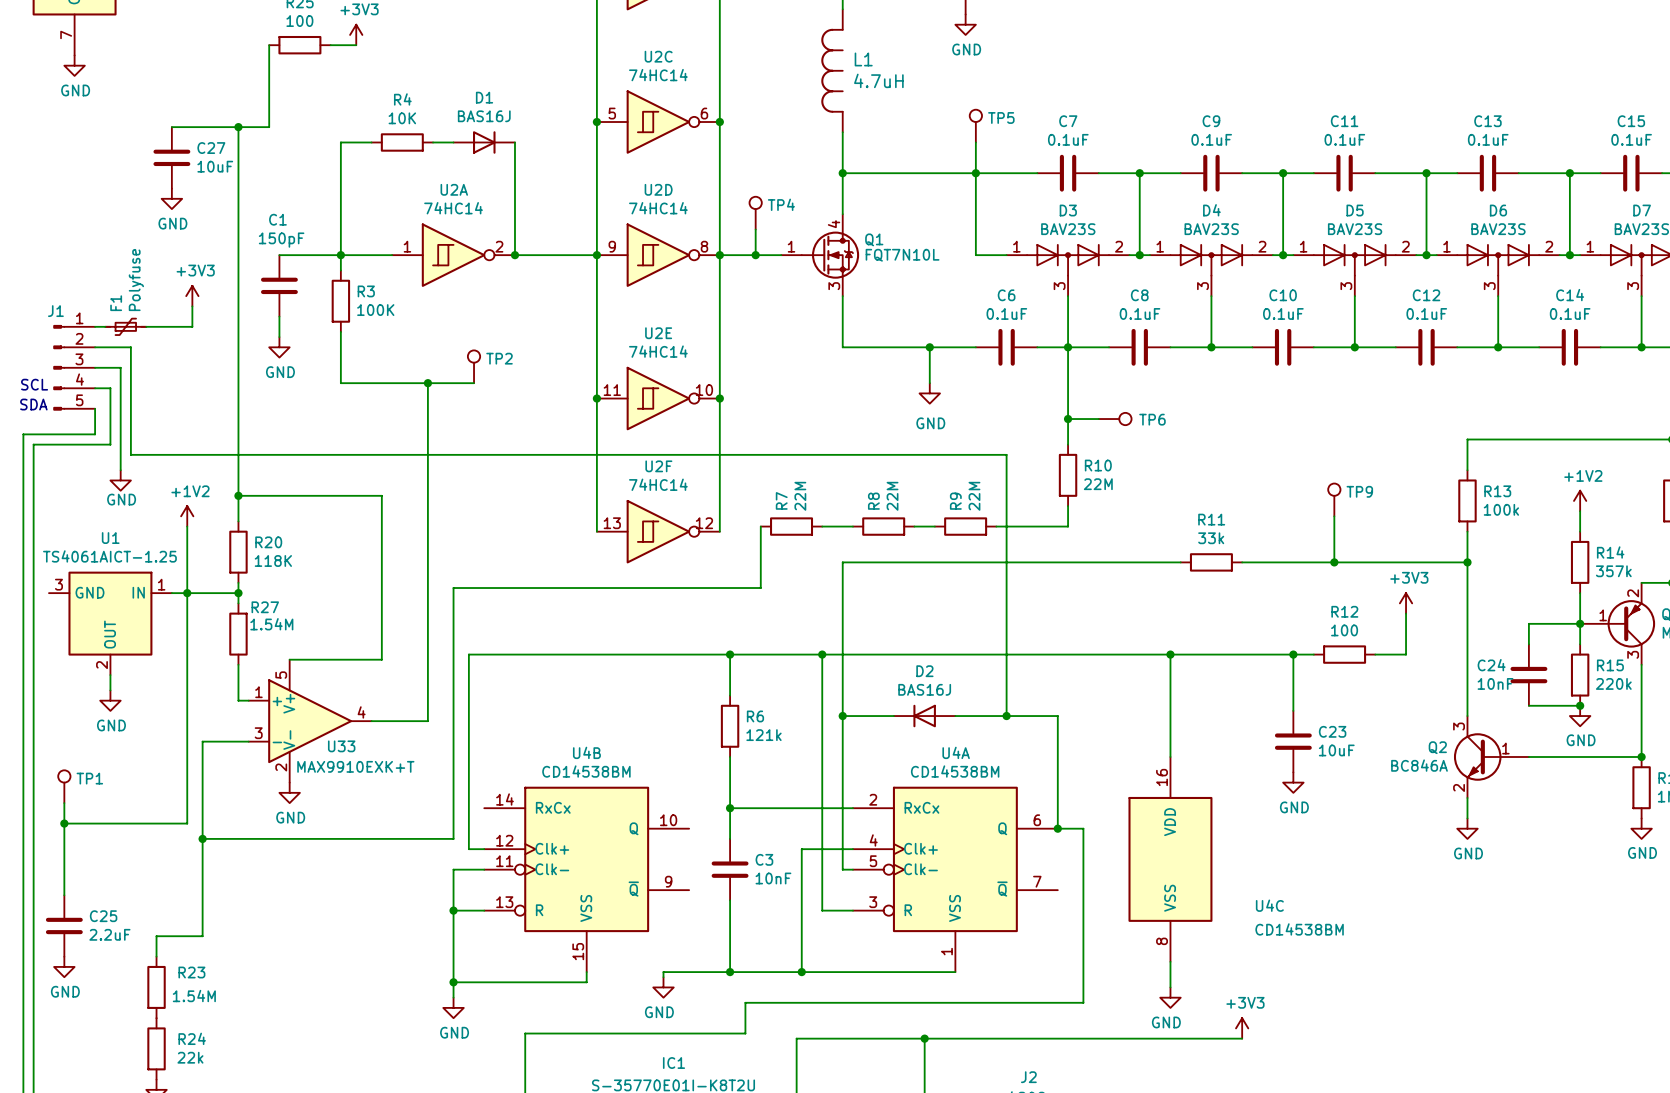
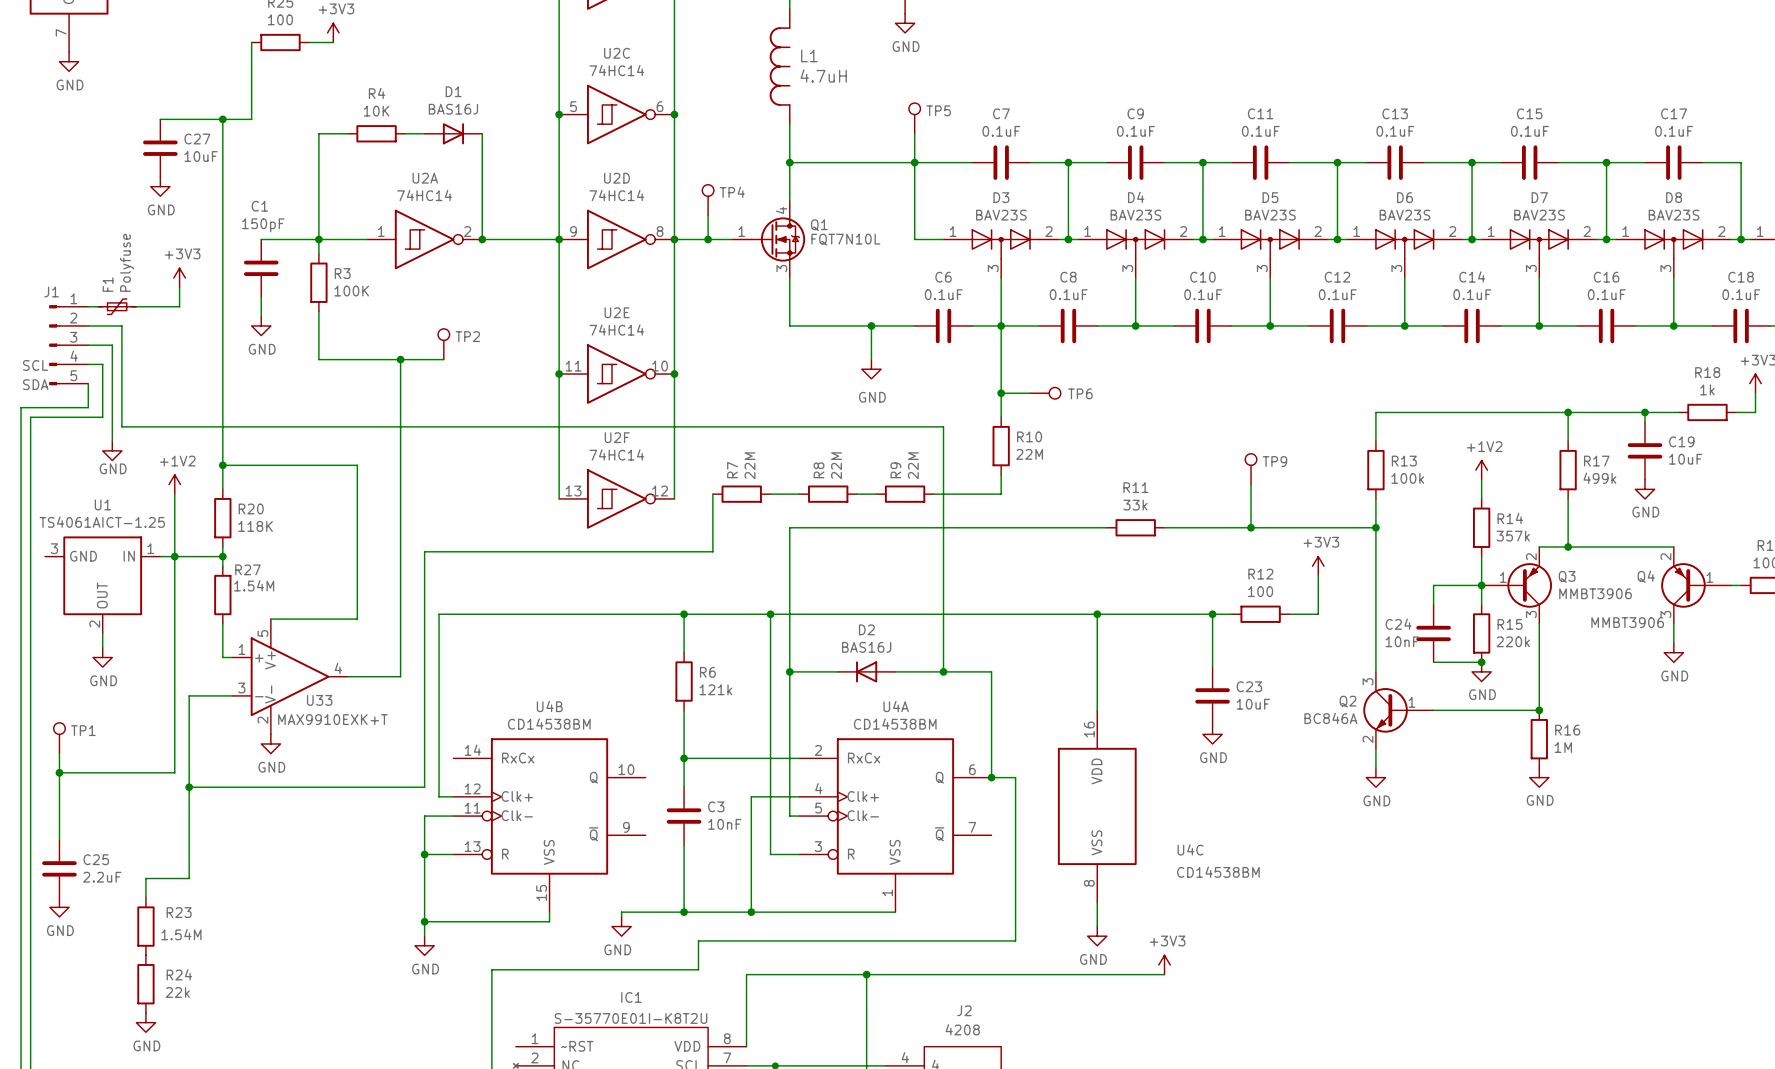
text: SCL (34, 384) -> none
label: none -> SCL (35, 365)
text: SDA (33, 404) -> none
label: none -> SDA (35, 384)

